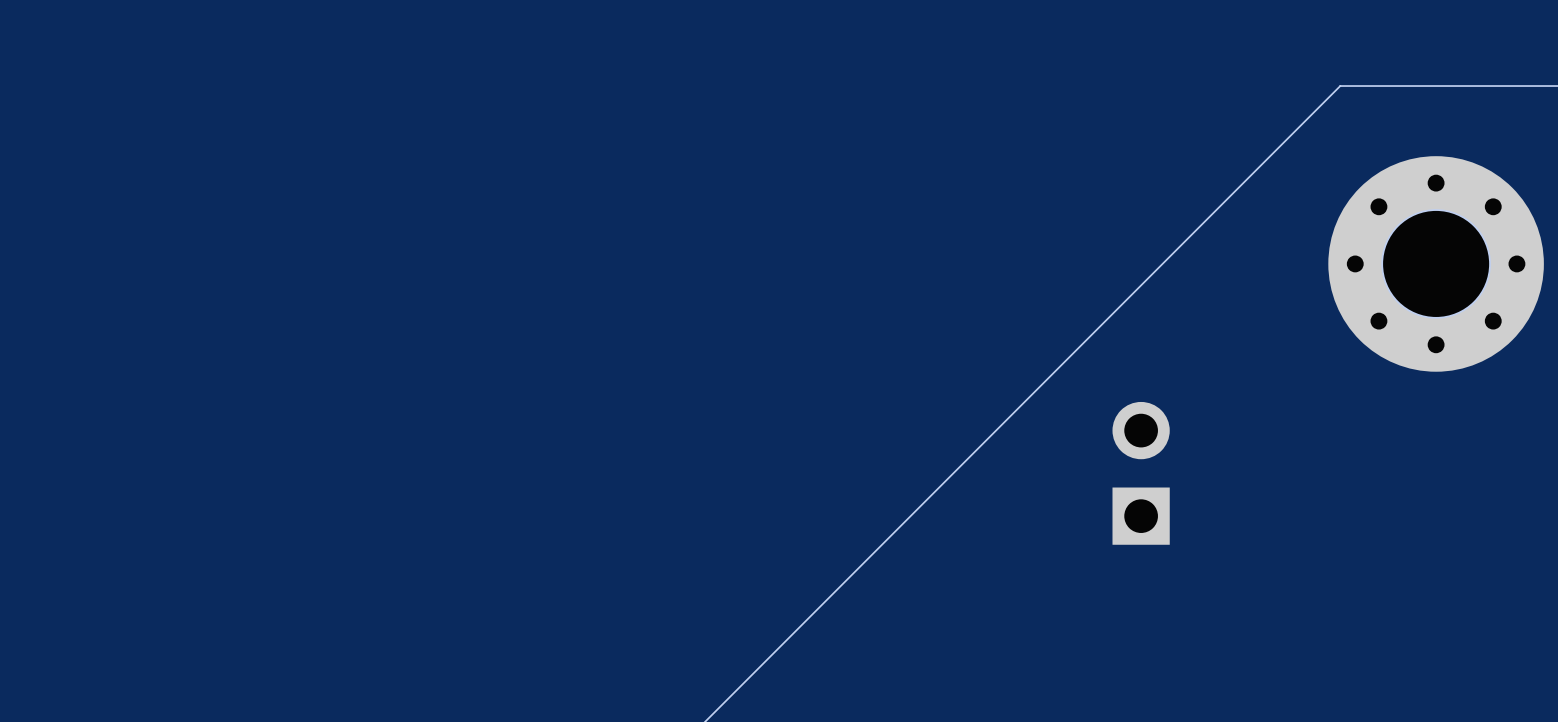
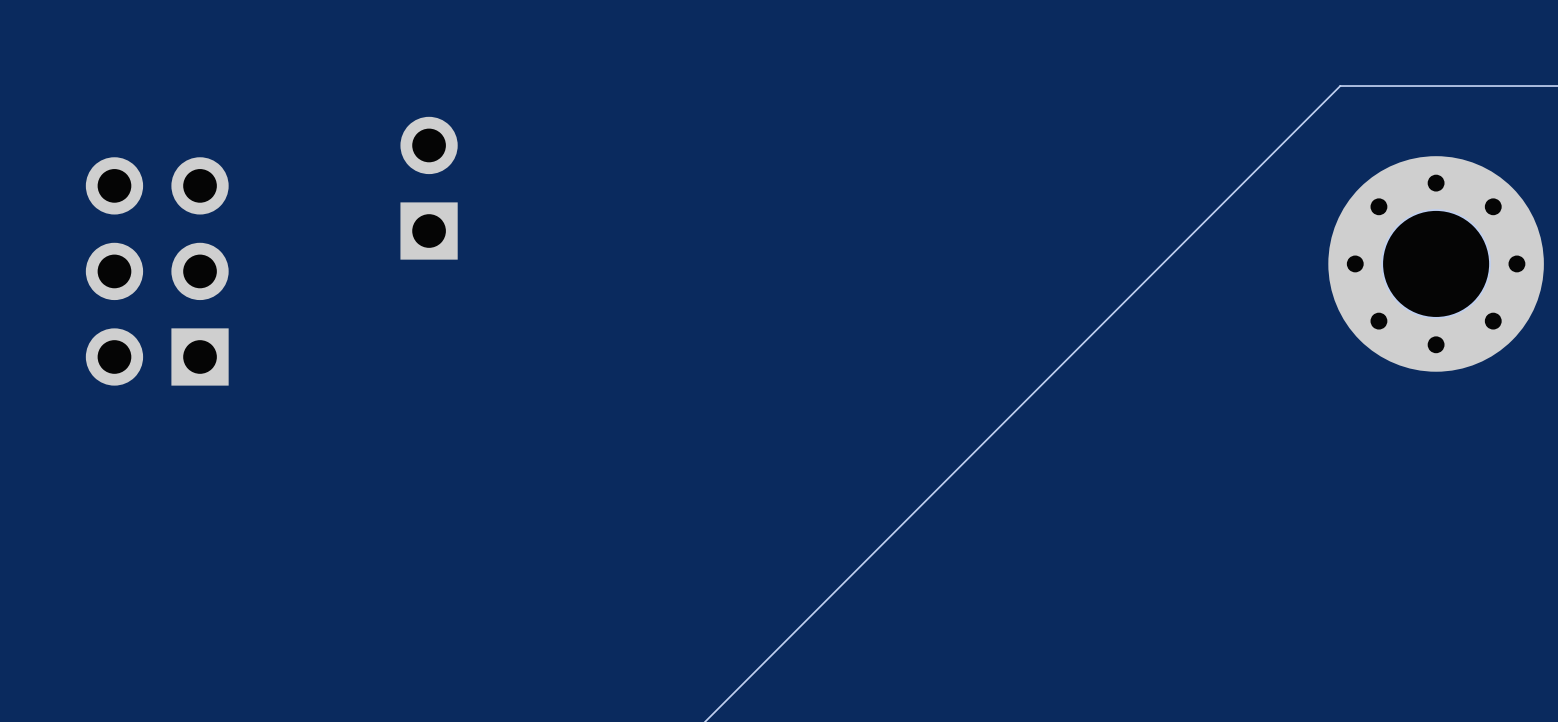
part: none -> (157, 271)
part position: (1141, 473) -> (429, 188)

